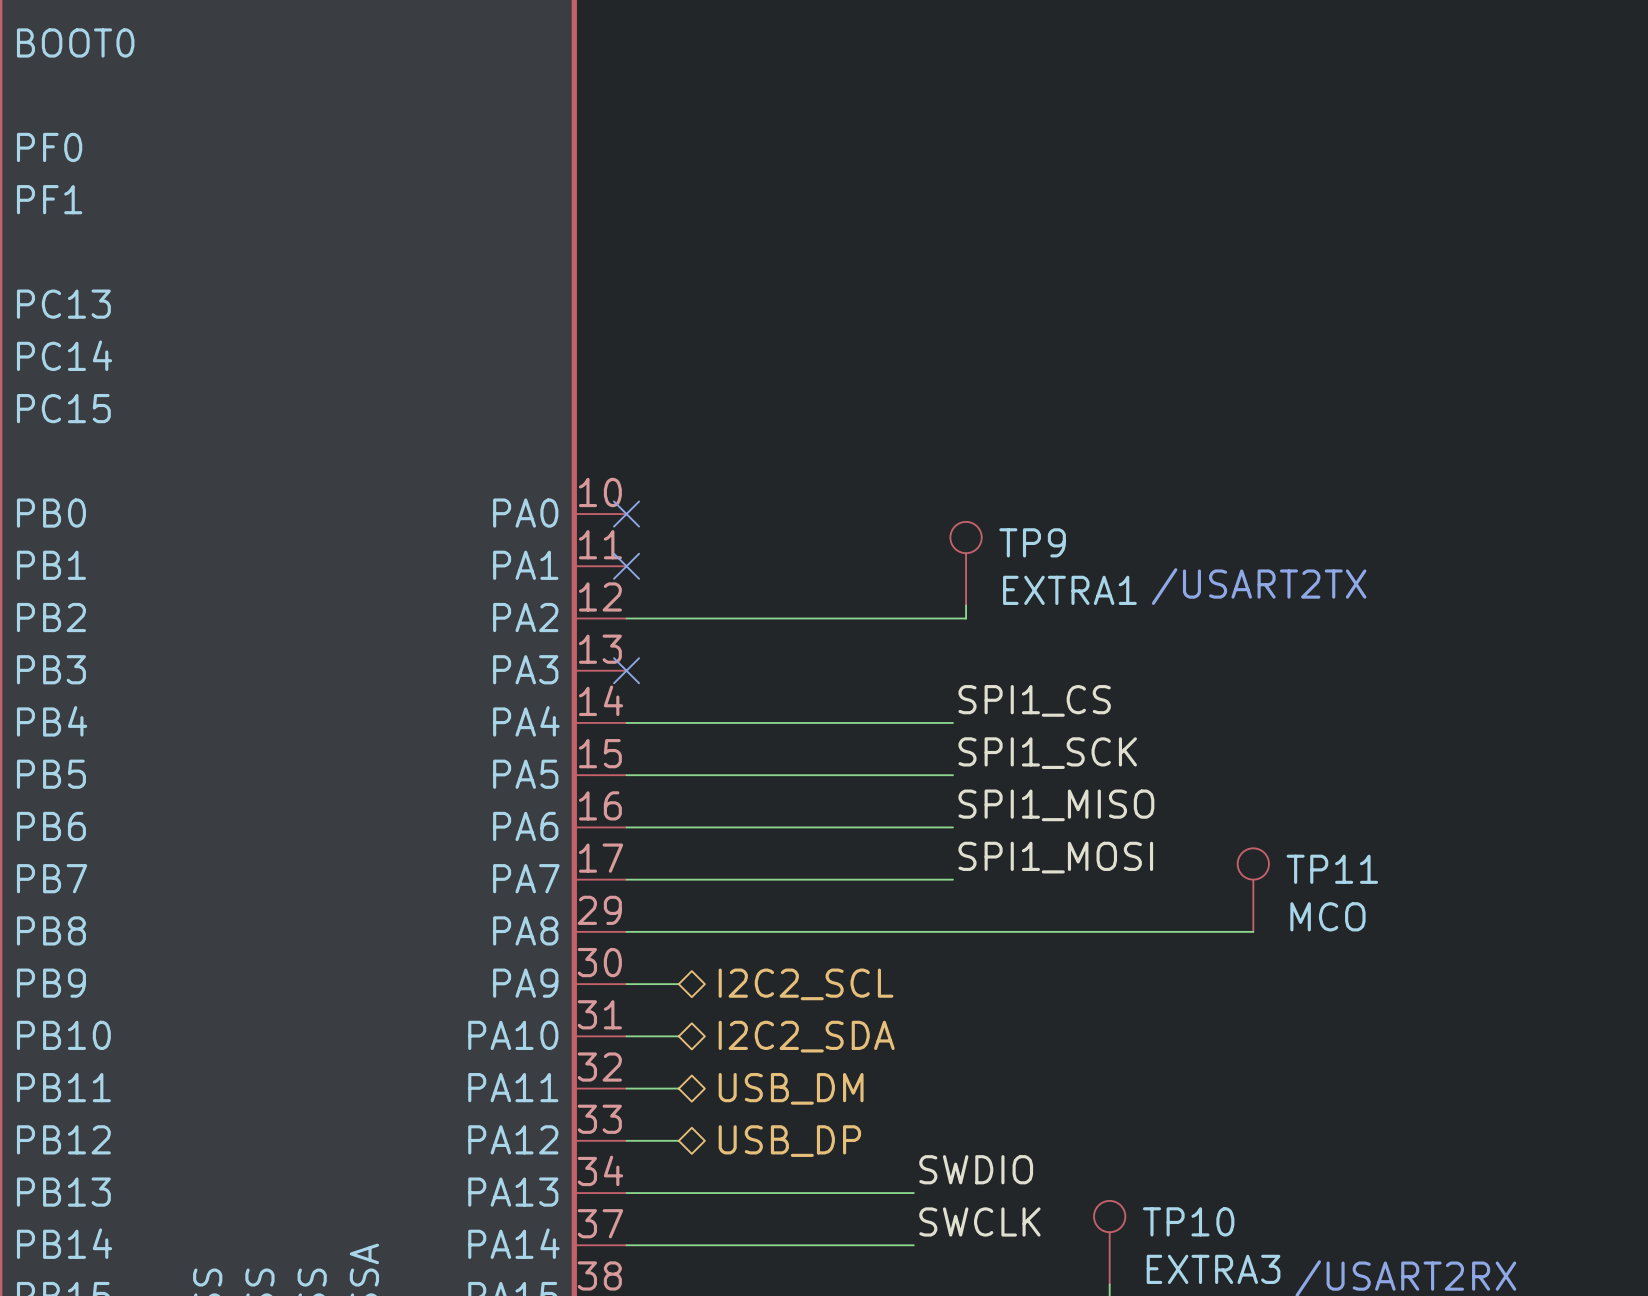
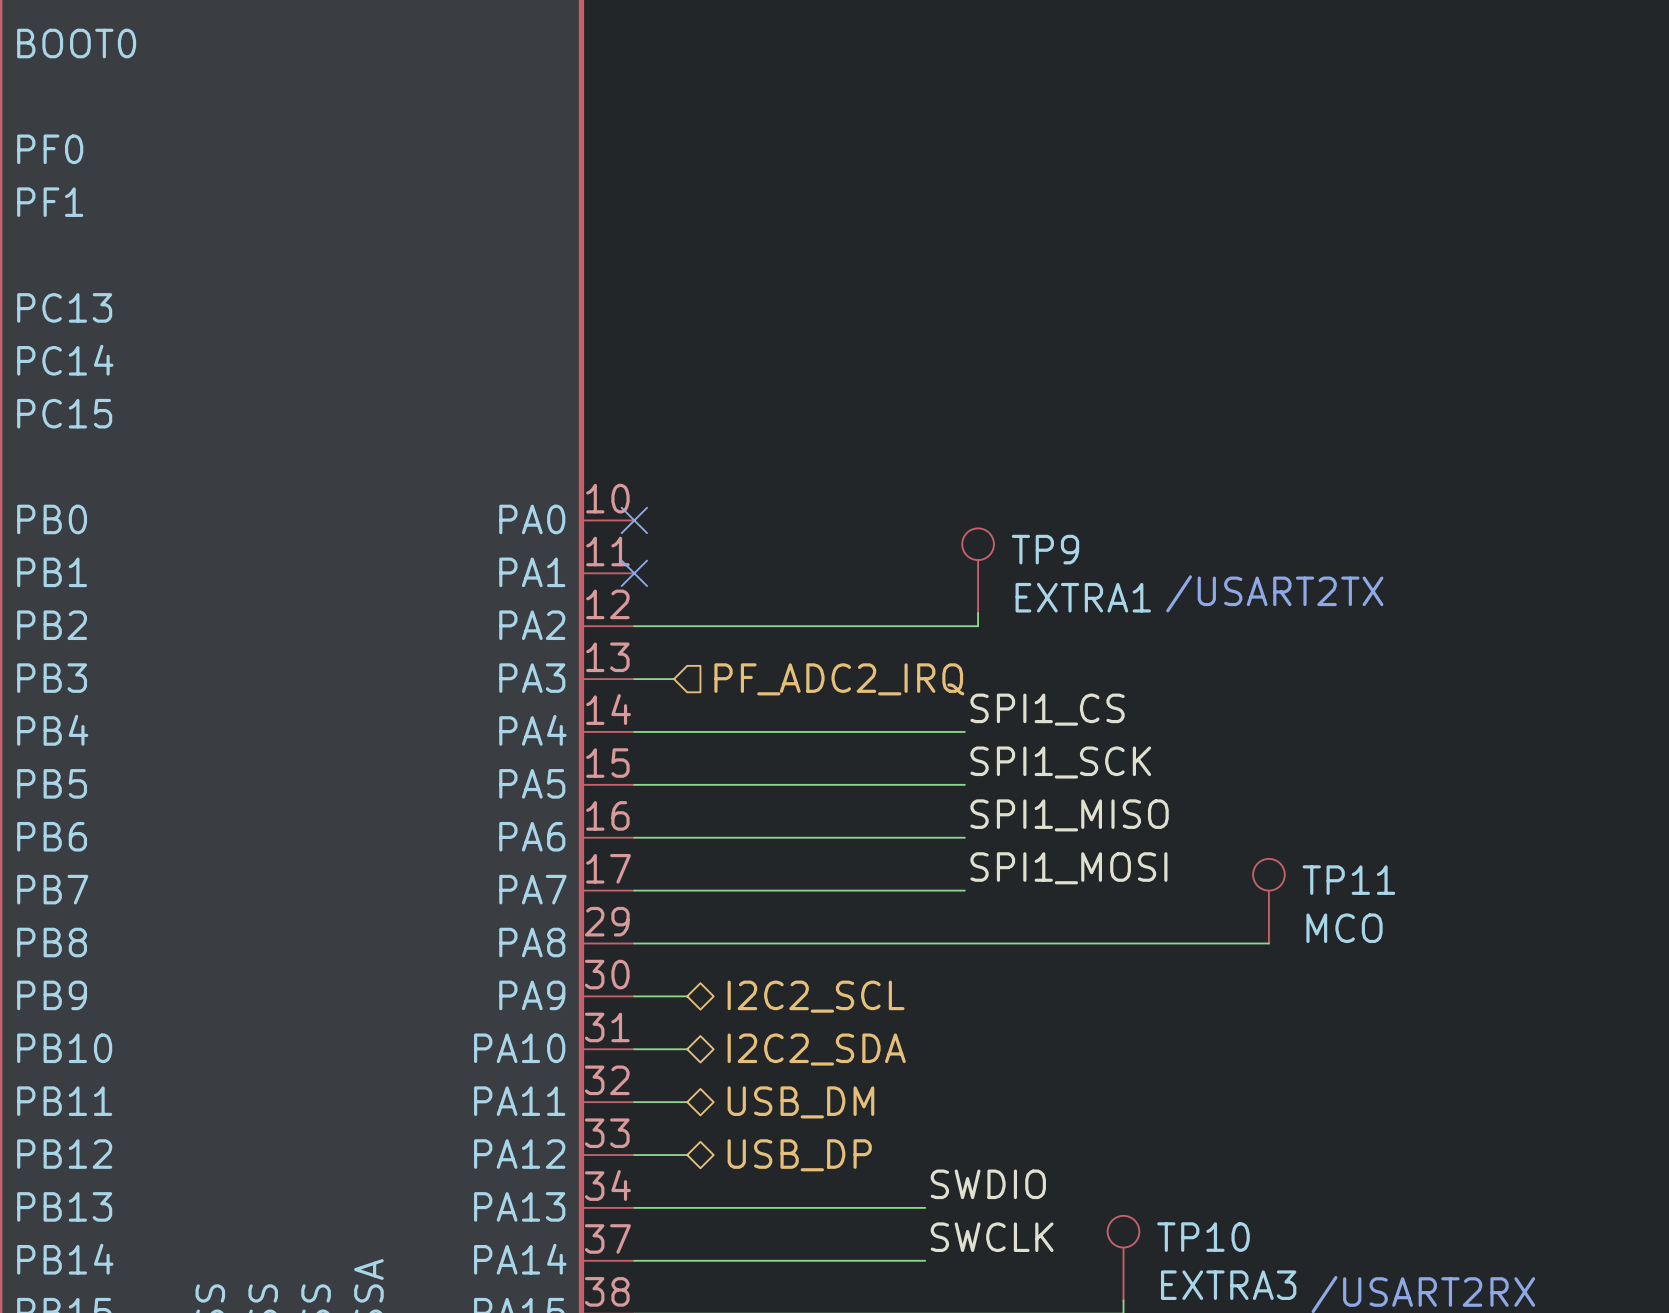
wire: none -> (634, 679) (674, 679)
no-connect mark: (626, 670) -> none
hierarchical label: none -> PF_ADC2_IRQ (839, 679)

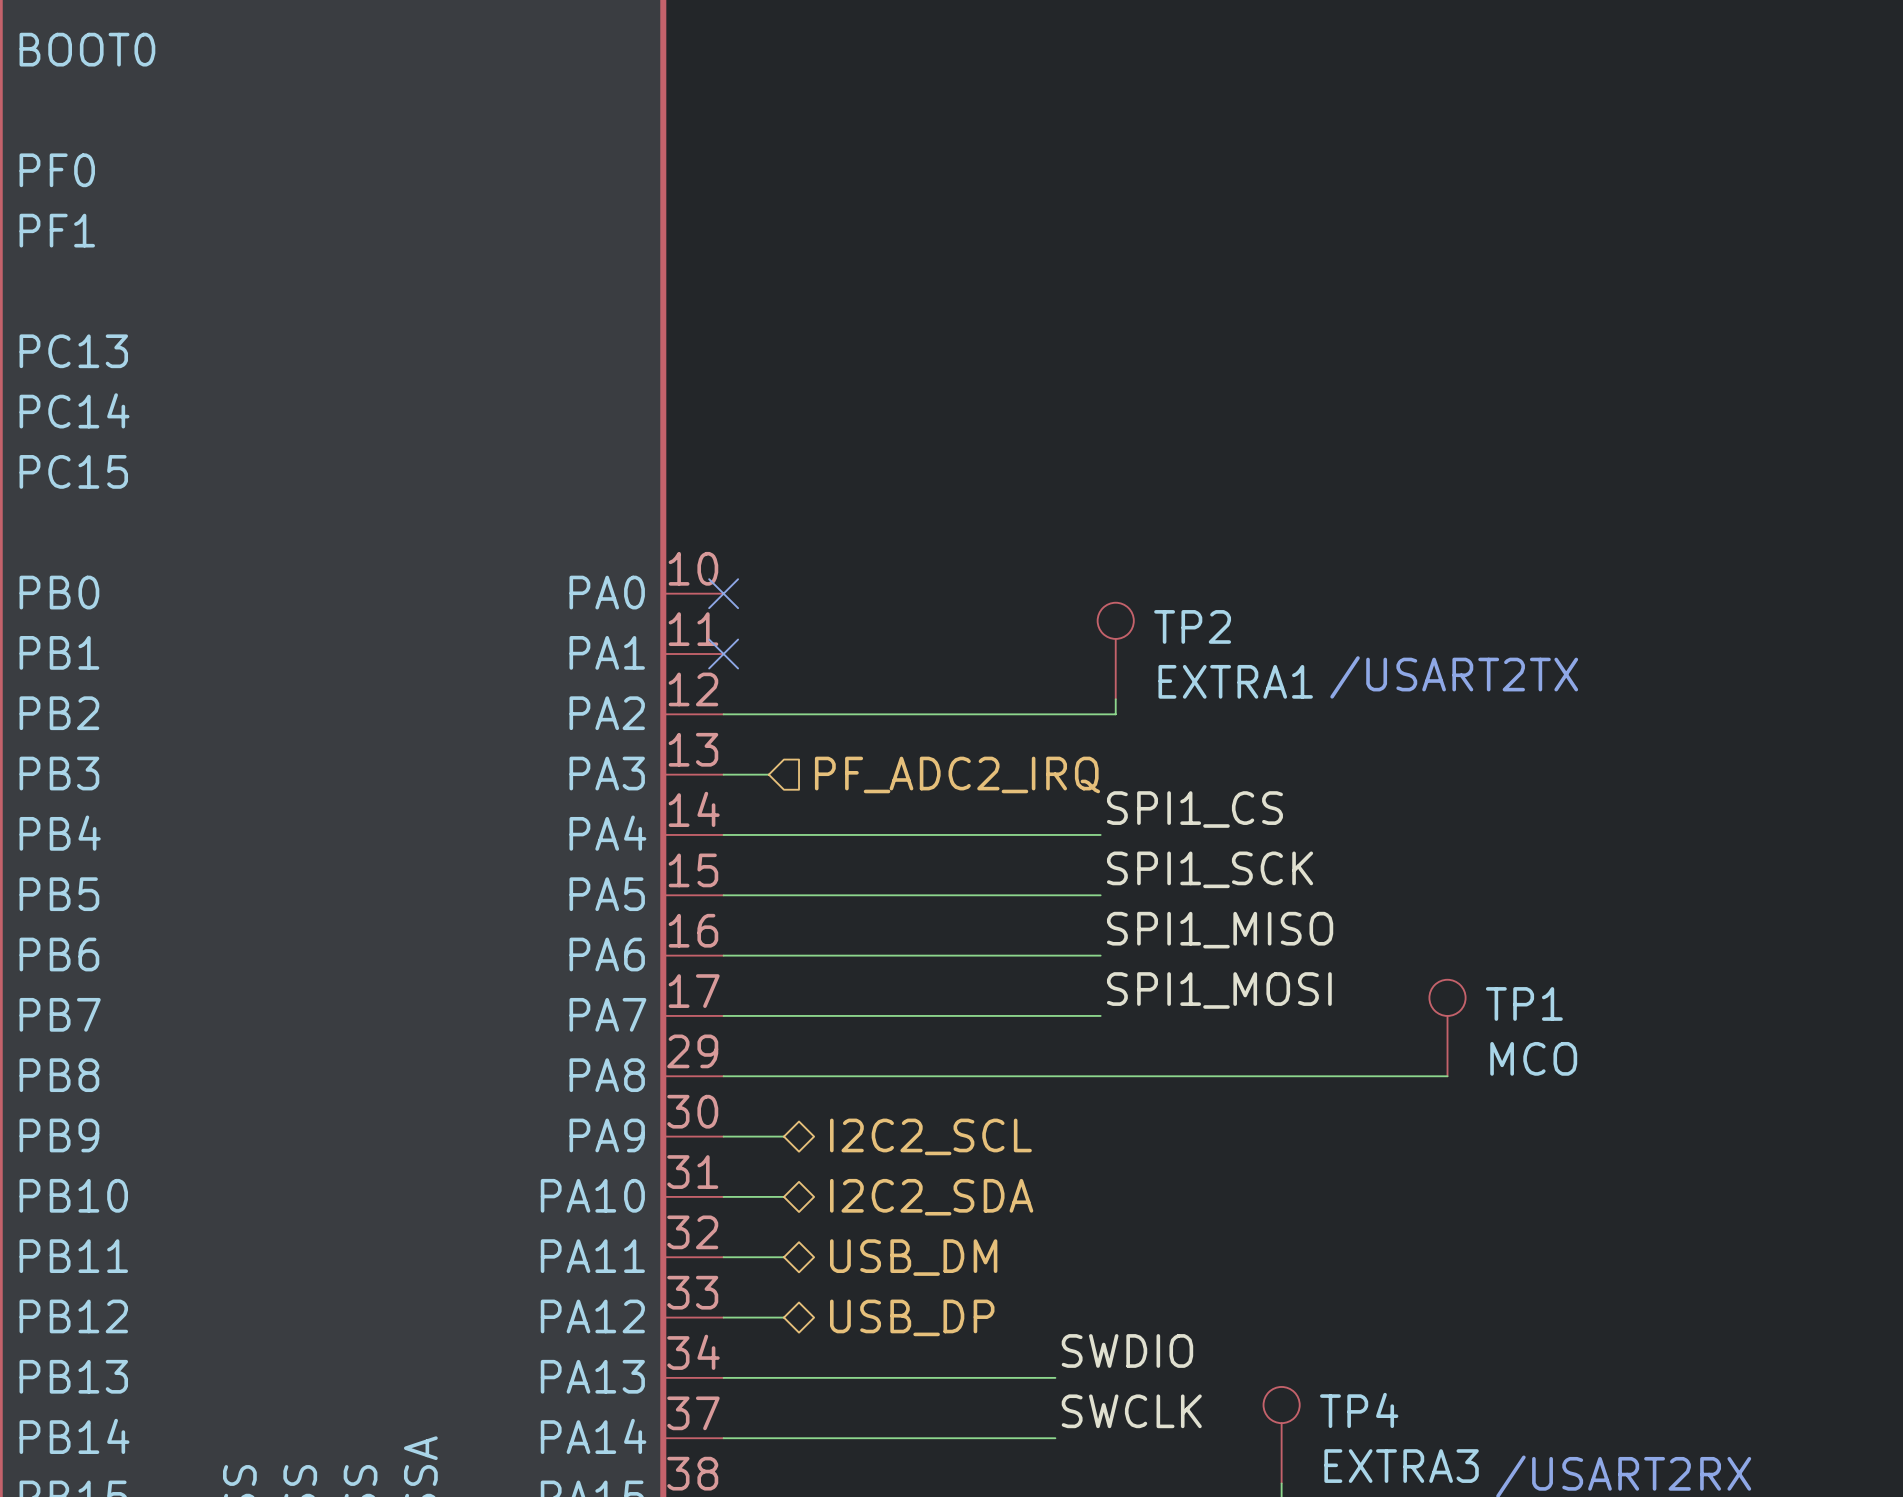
TP9 name: TP9 (1045, 549) -> TP2 (1192, 626)
TP11 name: TP11 (1348, 880) -> TP1 (1524, 1003)
TP10 name: TP10 (1203, 1237) -> TP4 (1359, 1410)

